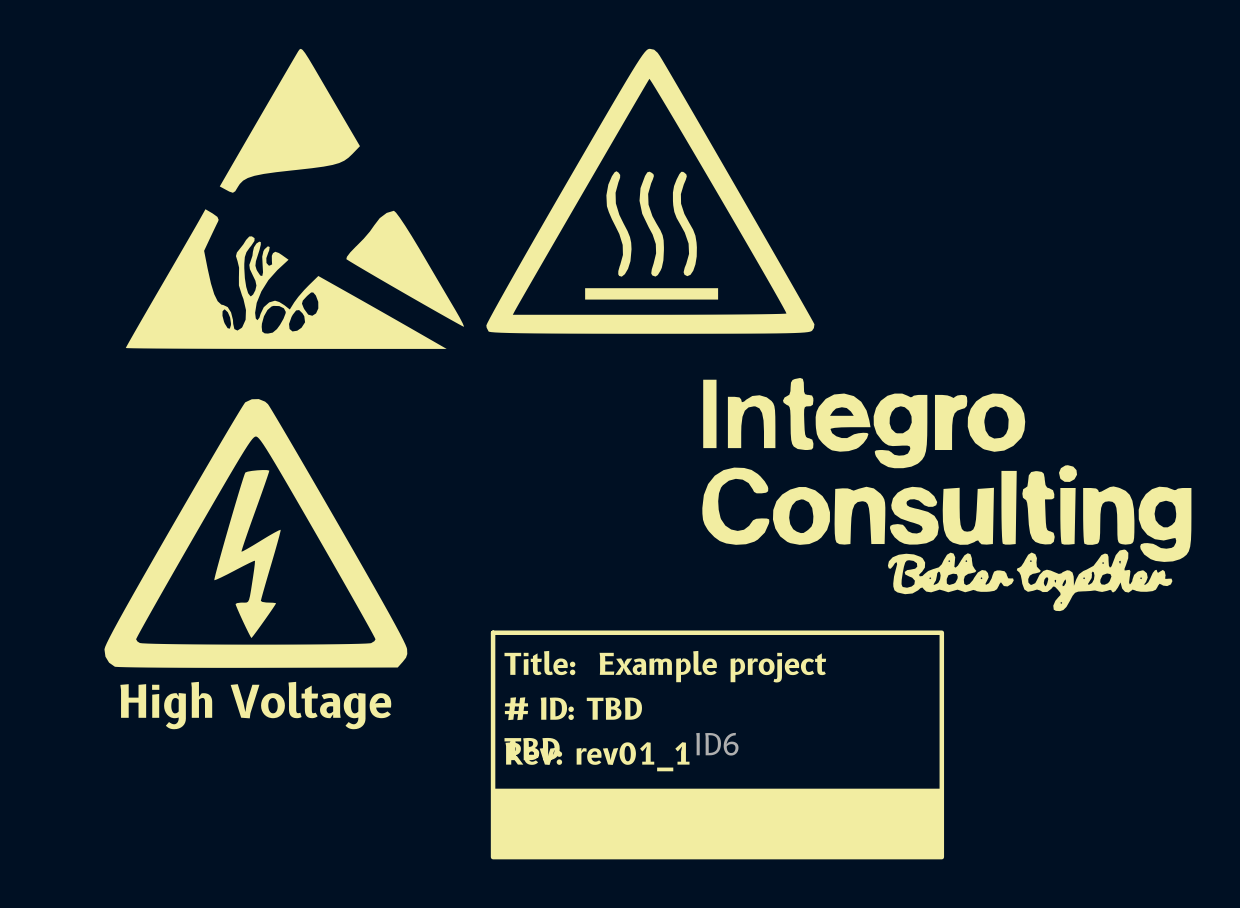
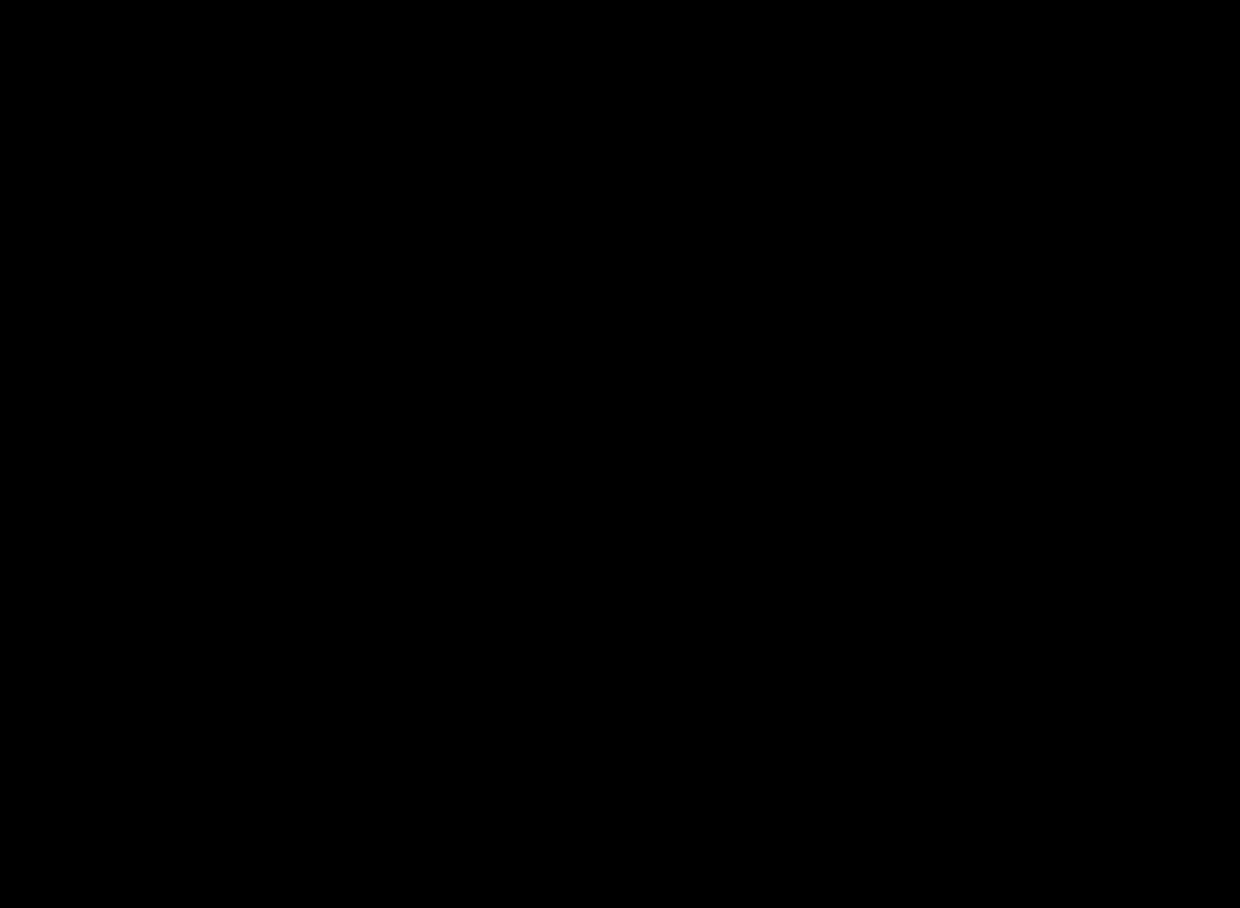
drawing: [125, 48, 815, 349] -> none
drawing: [702, 377, 1192, 612] -> none
drawing: [104, 399, 408, 668] -> none
ID6: (717, 744) -> none

